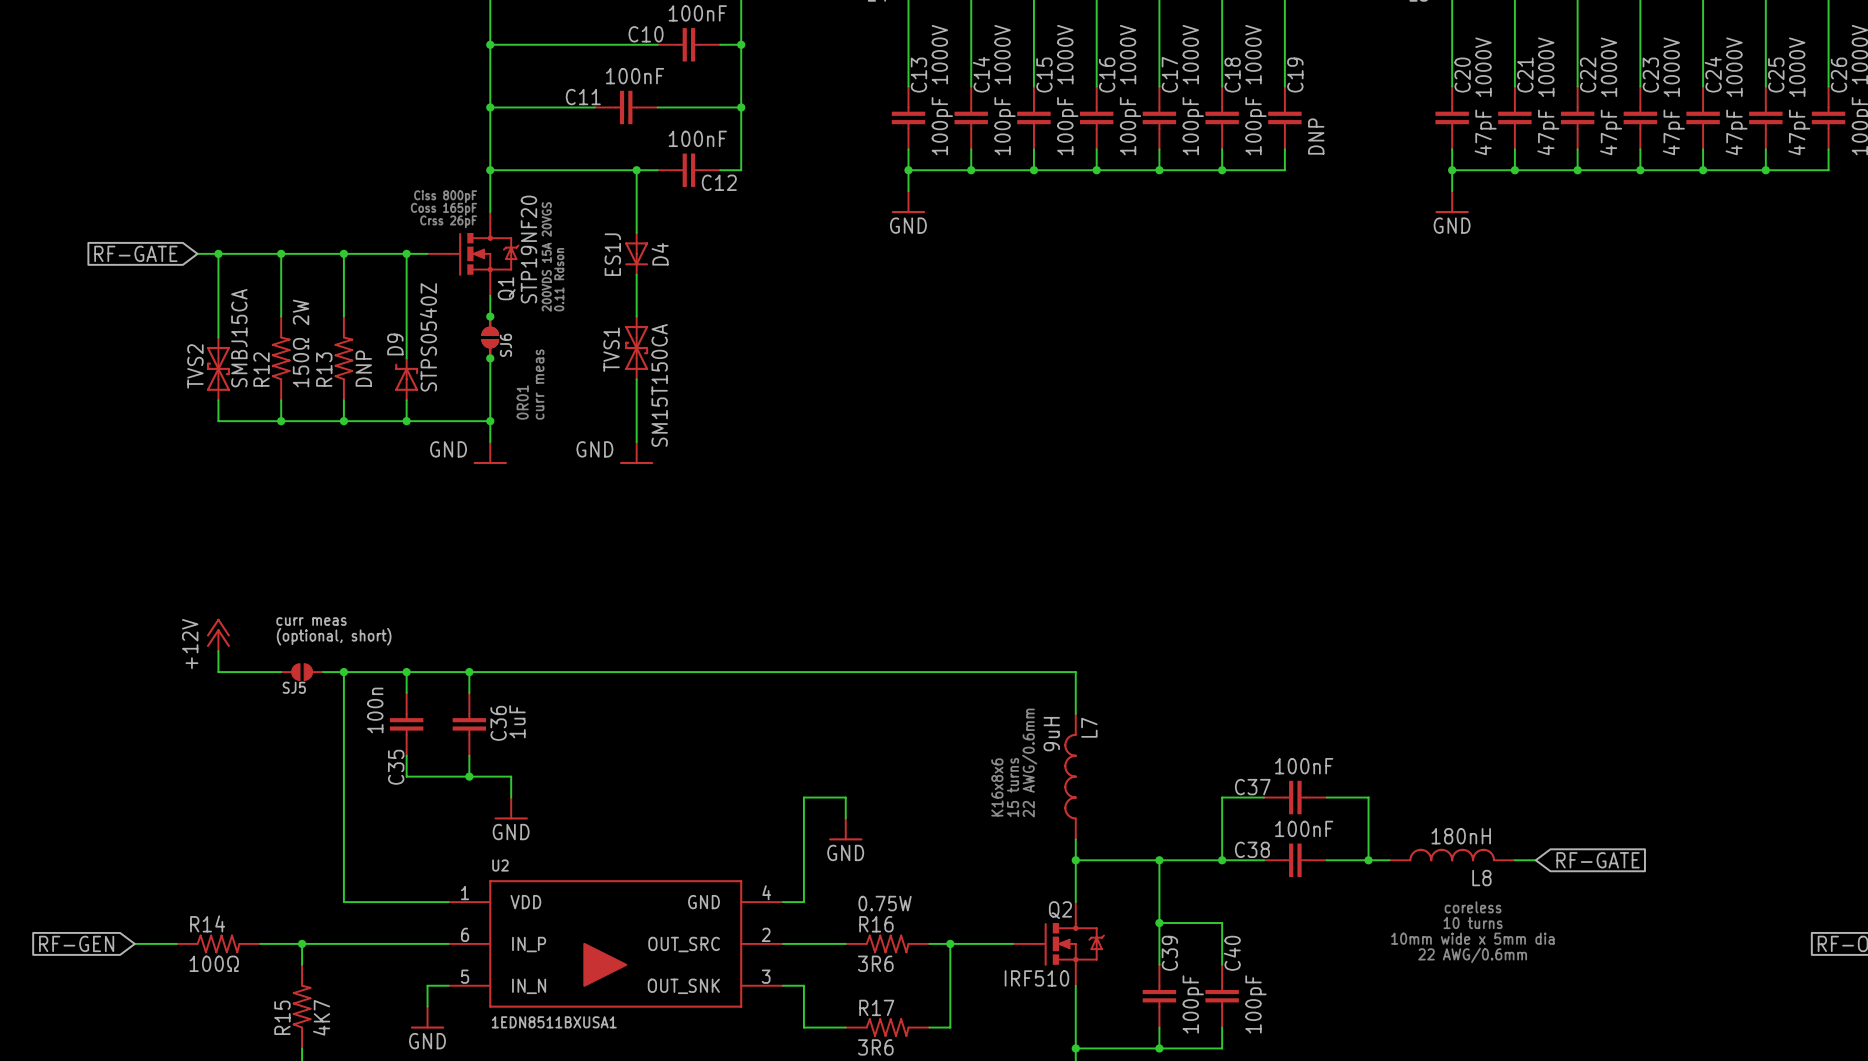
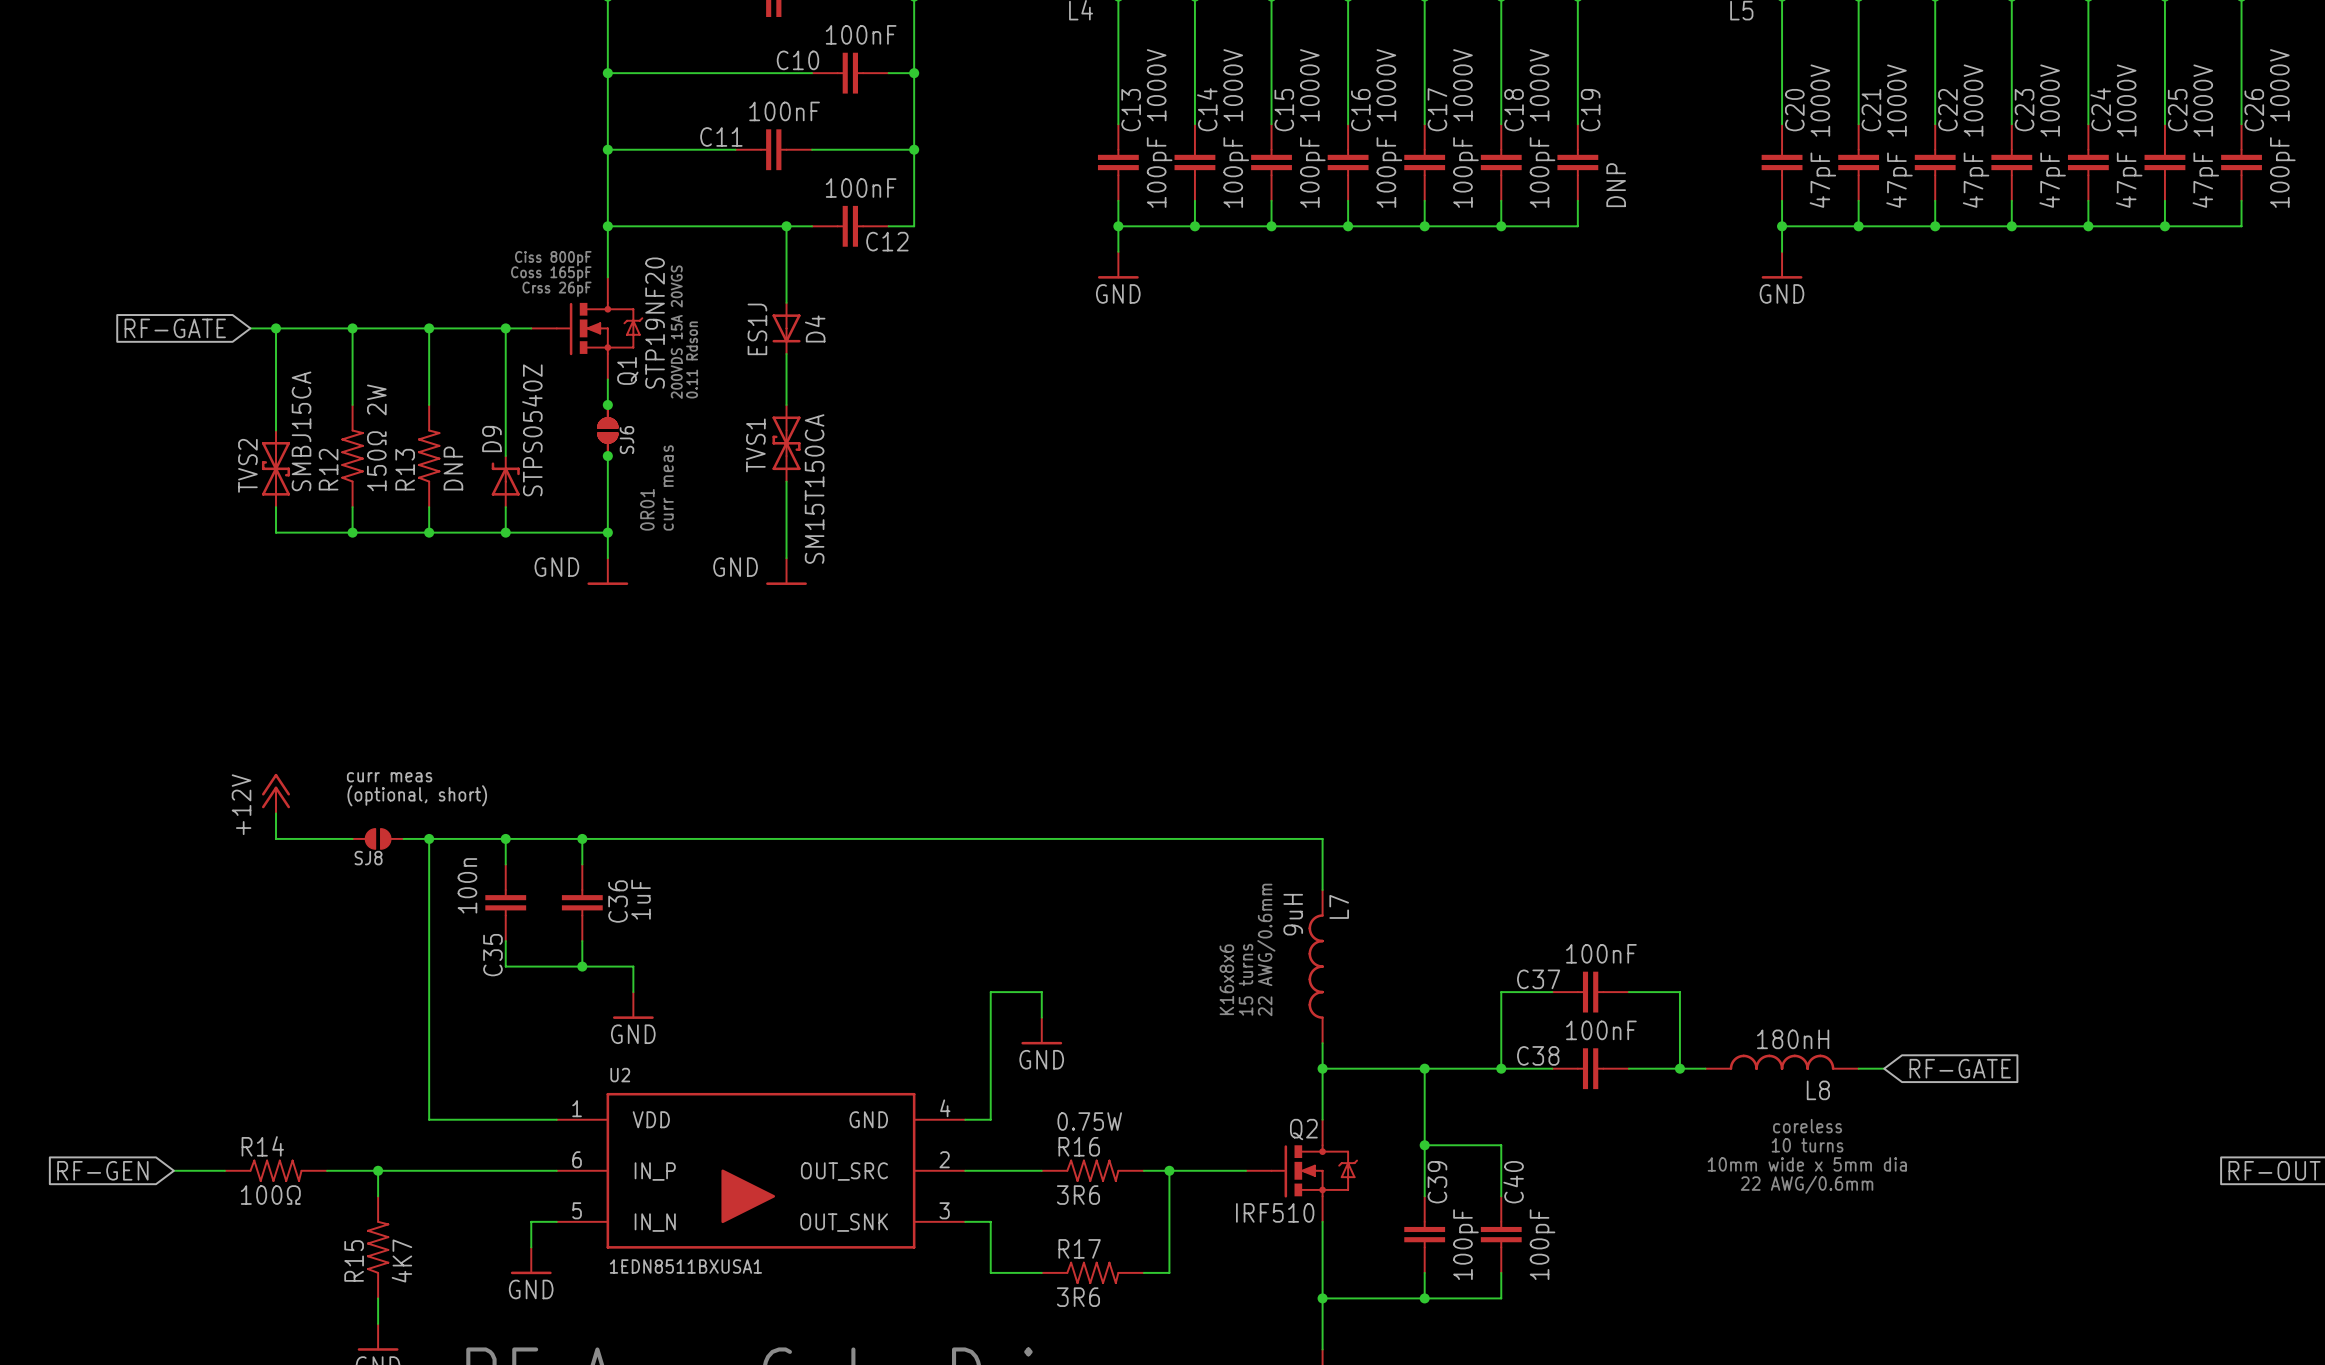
SJ5 name: SJ5 (294, 687) -> SJ8 (368, 858)

